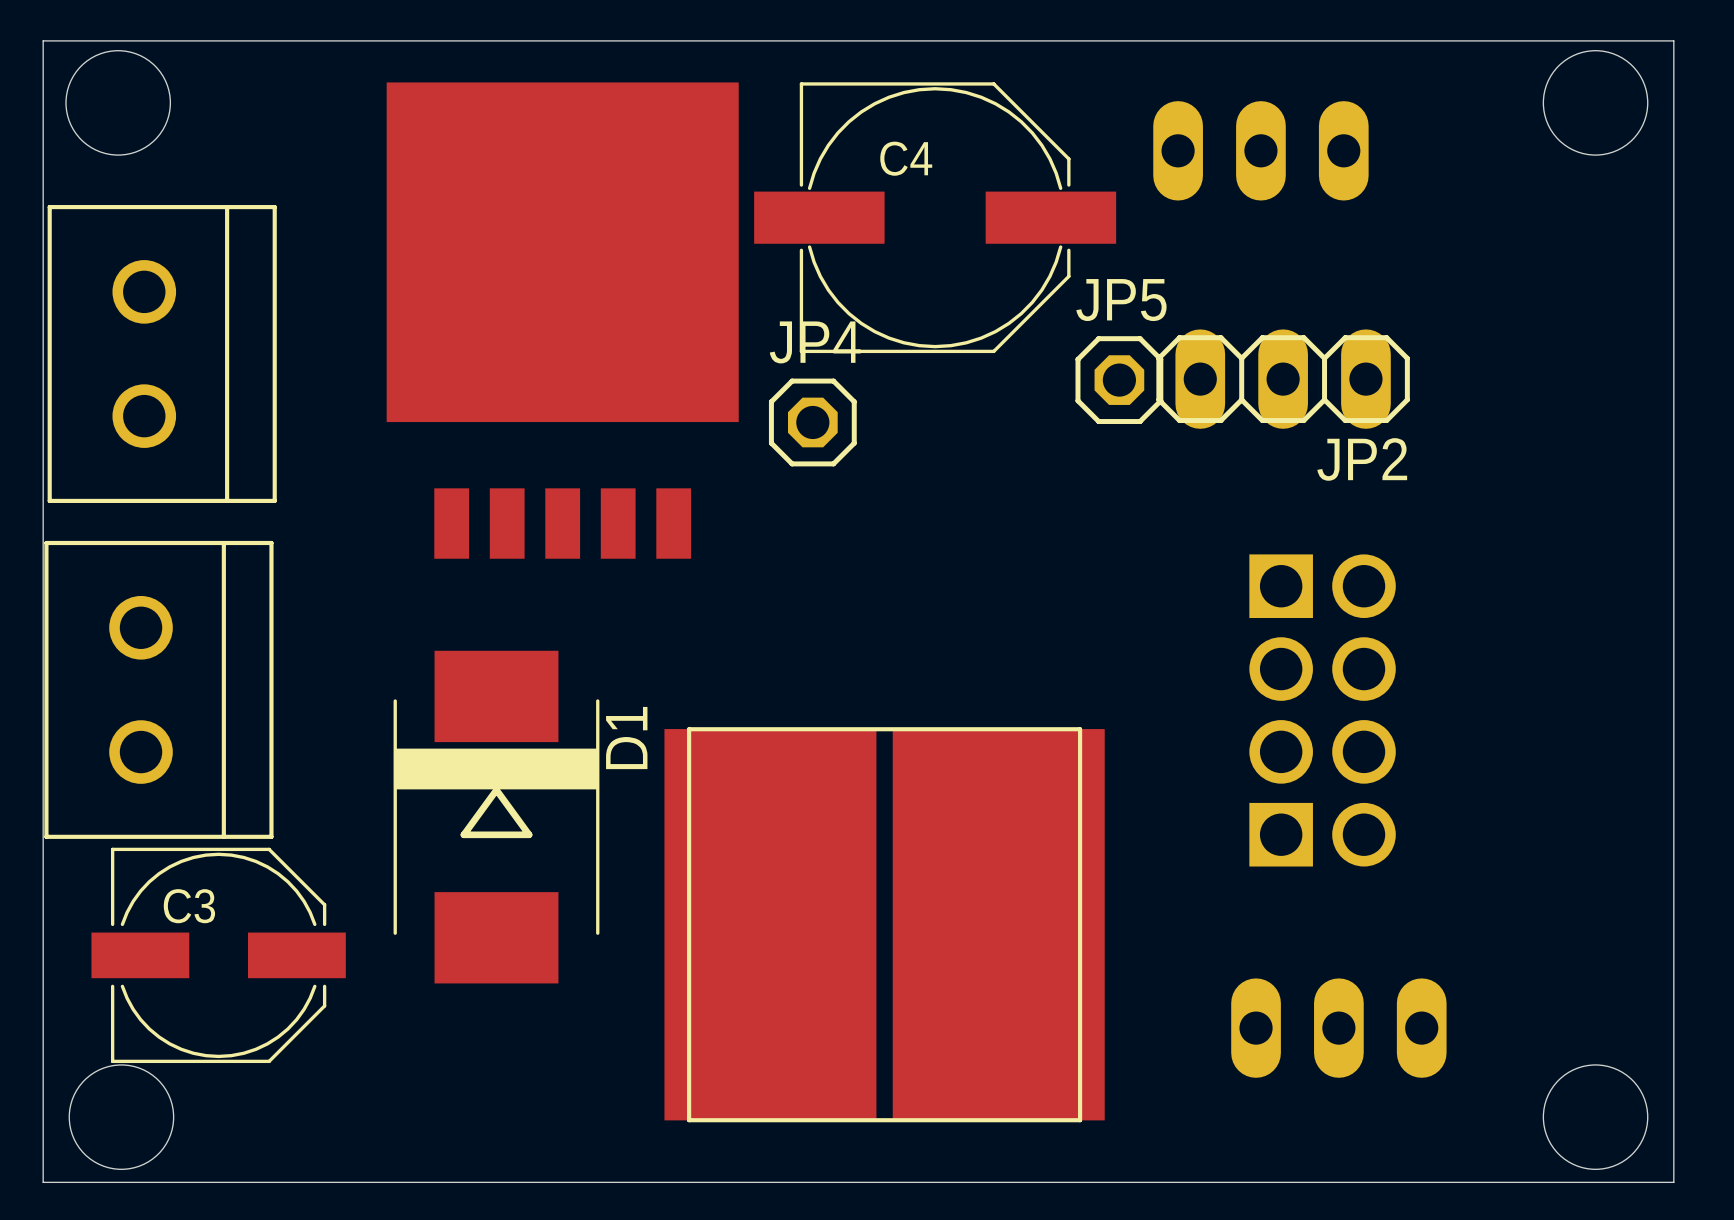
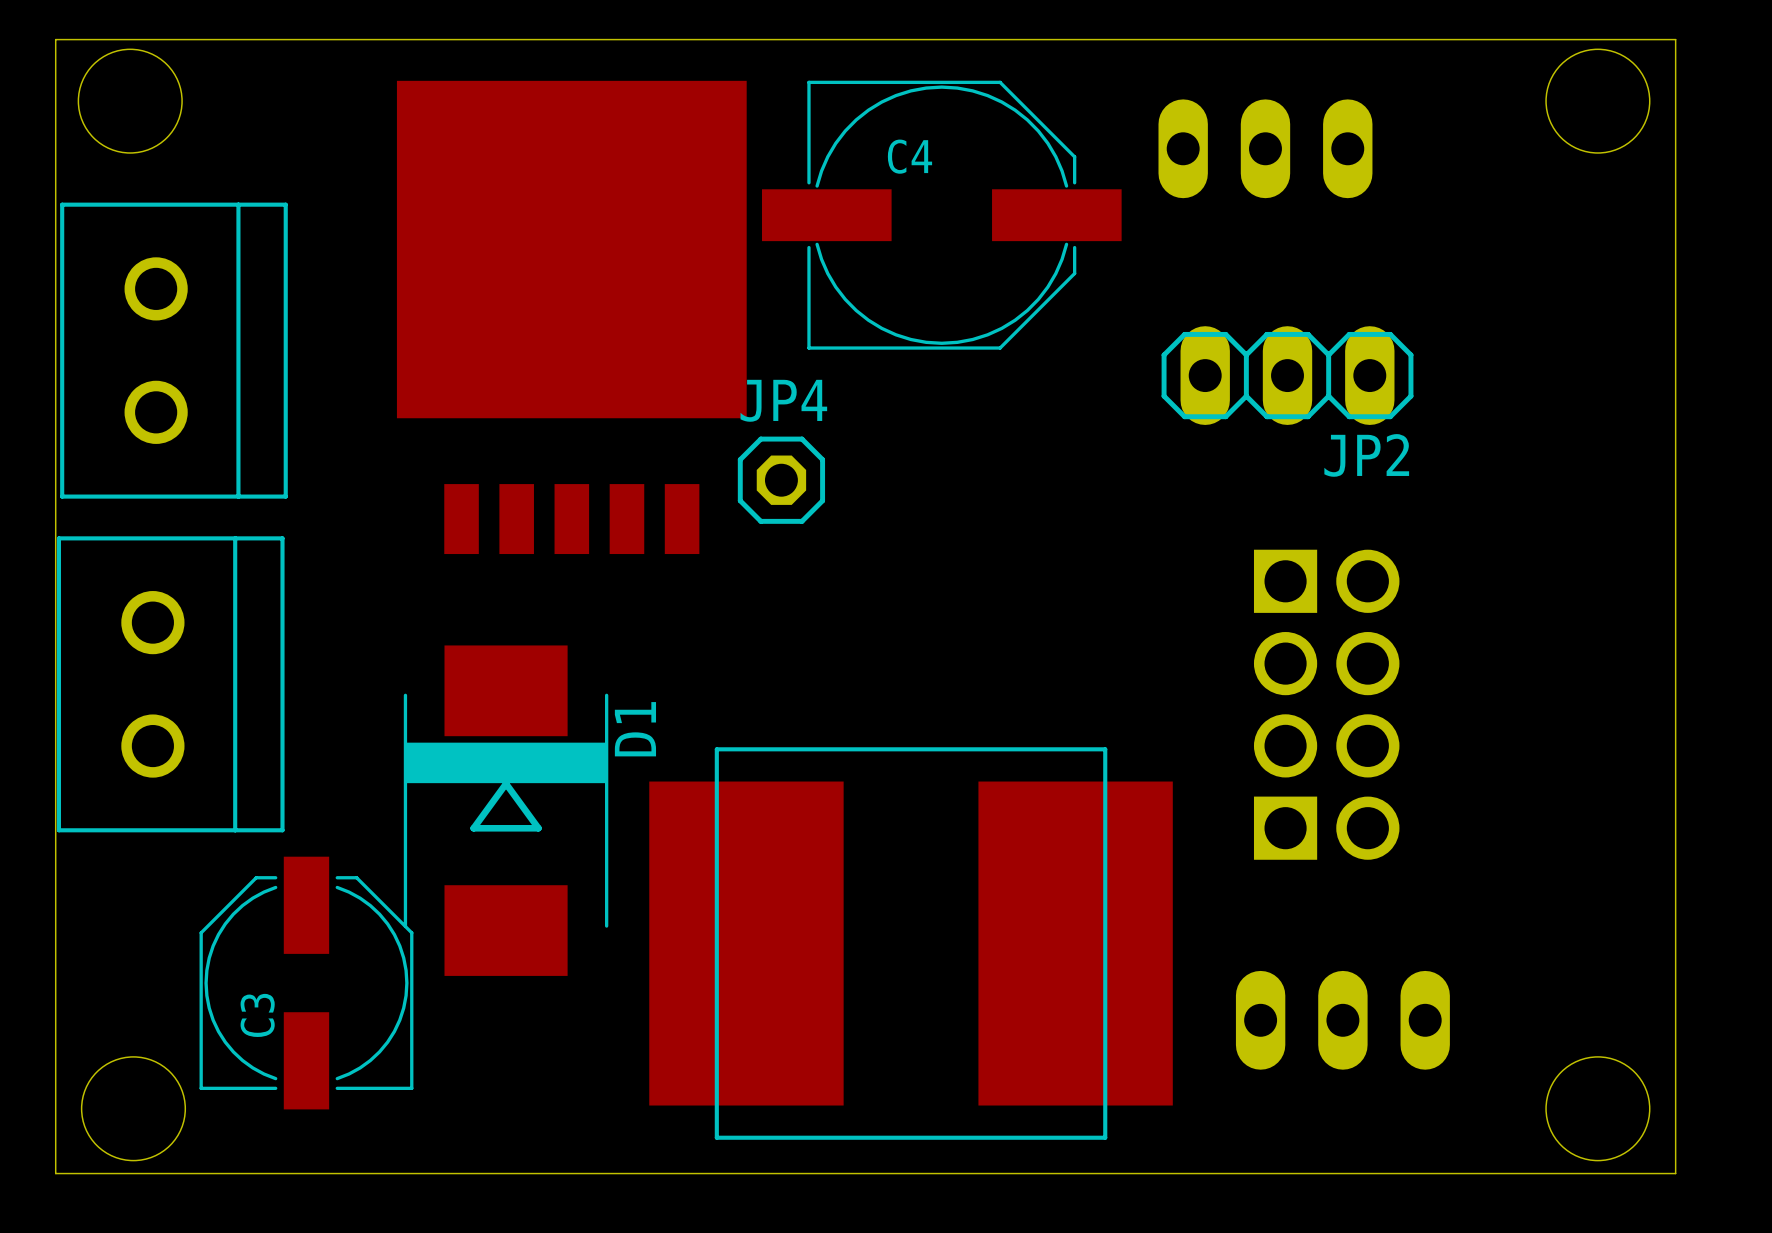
JP5: (1119, 380) -> none
JP4 position: (812, 422) -> (781, 480)
part: (884, 924) -> none
part: none -> (911, 943)
C3 rotation: 0° (218, 955) -> 90° counterclockwise (306, 983)

